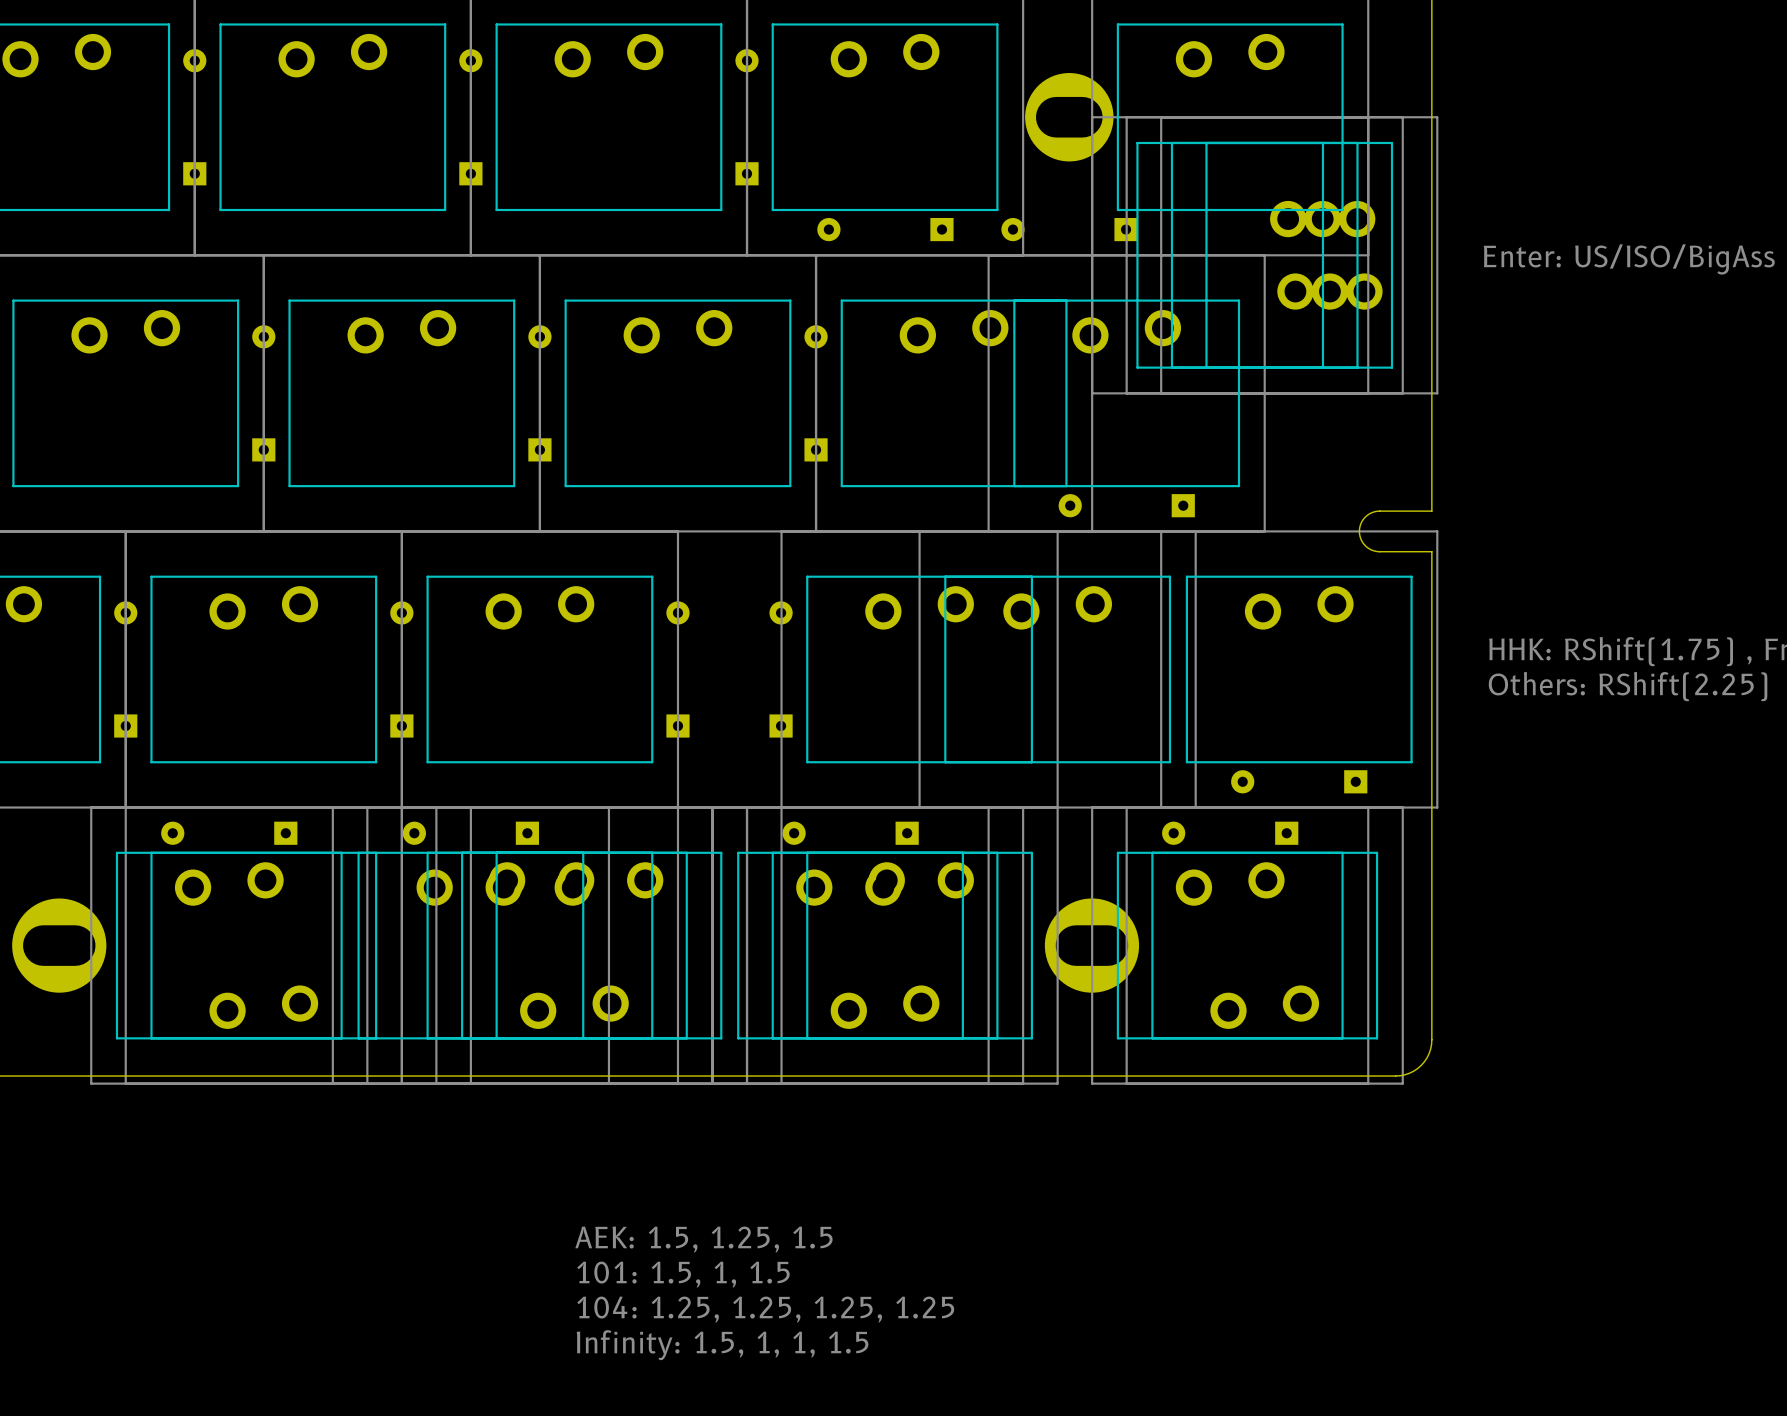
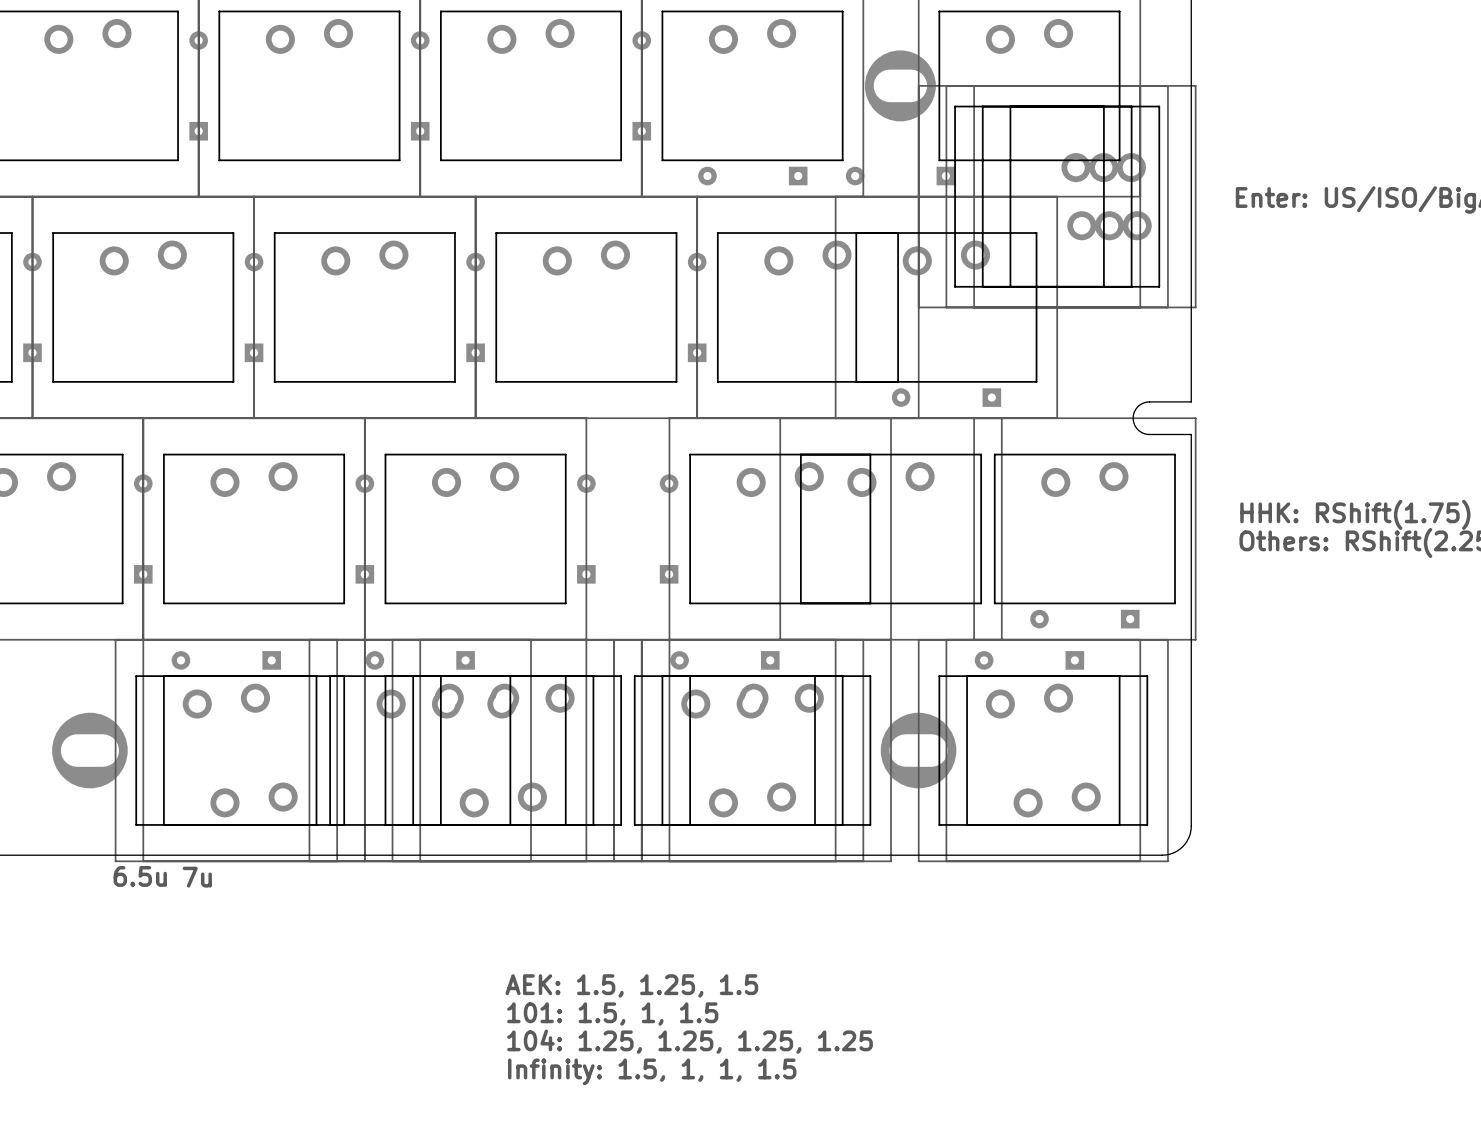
text: none -> 6.5u (140, 876)
text: none -> 7u (197, 877)

